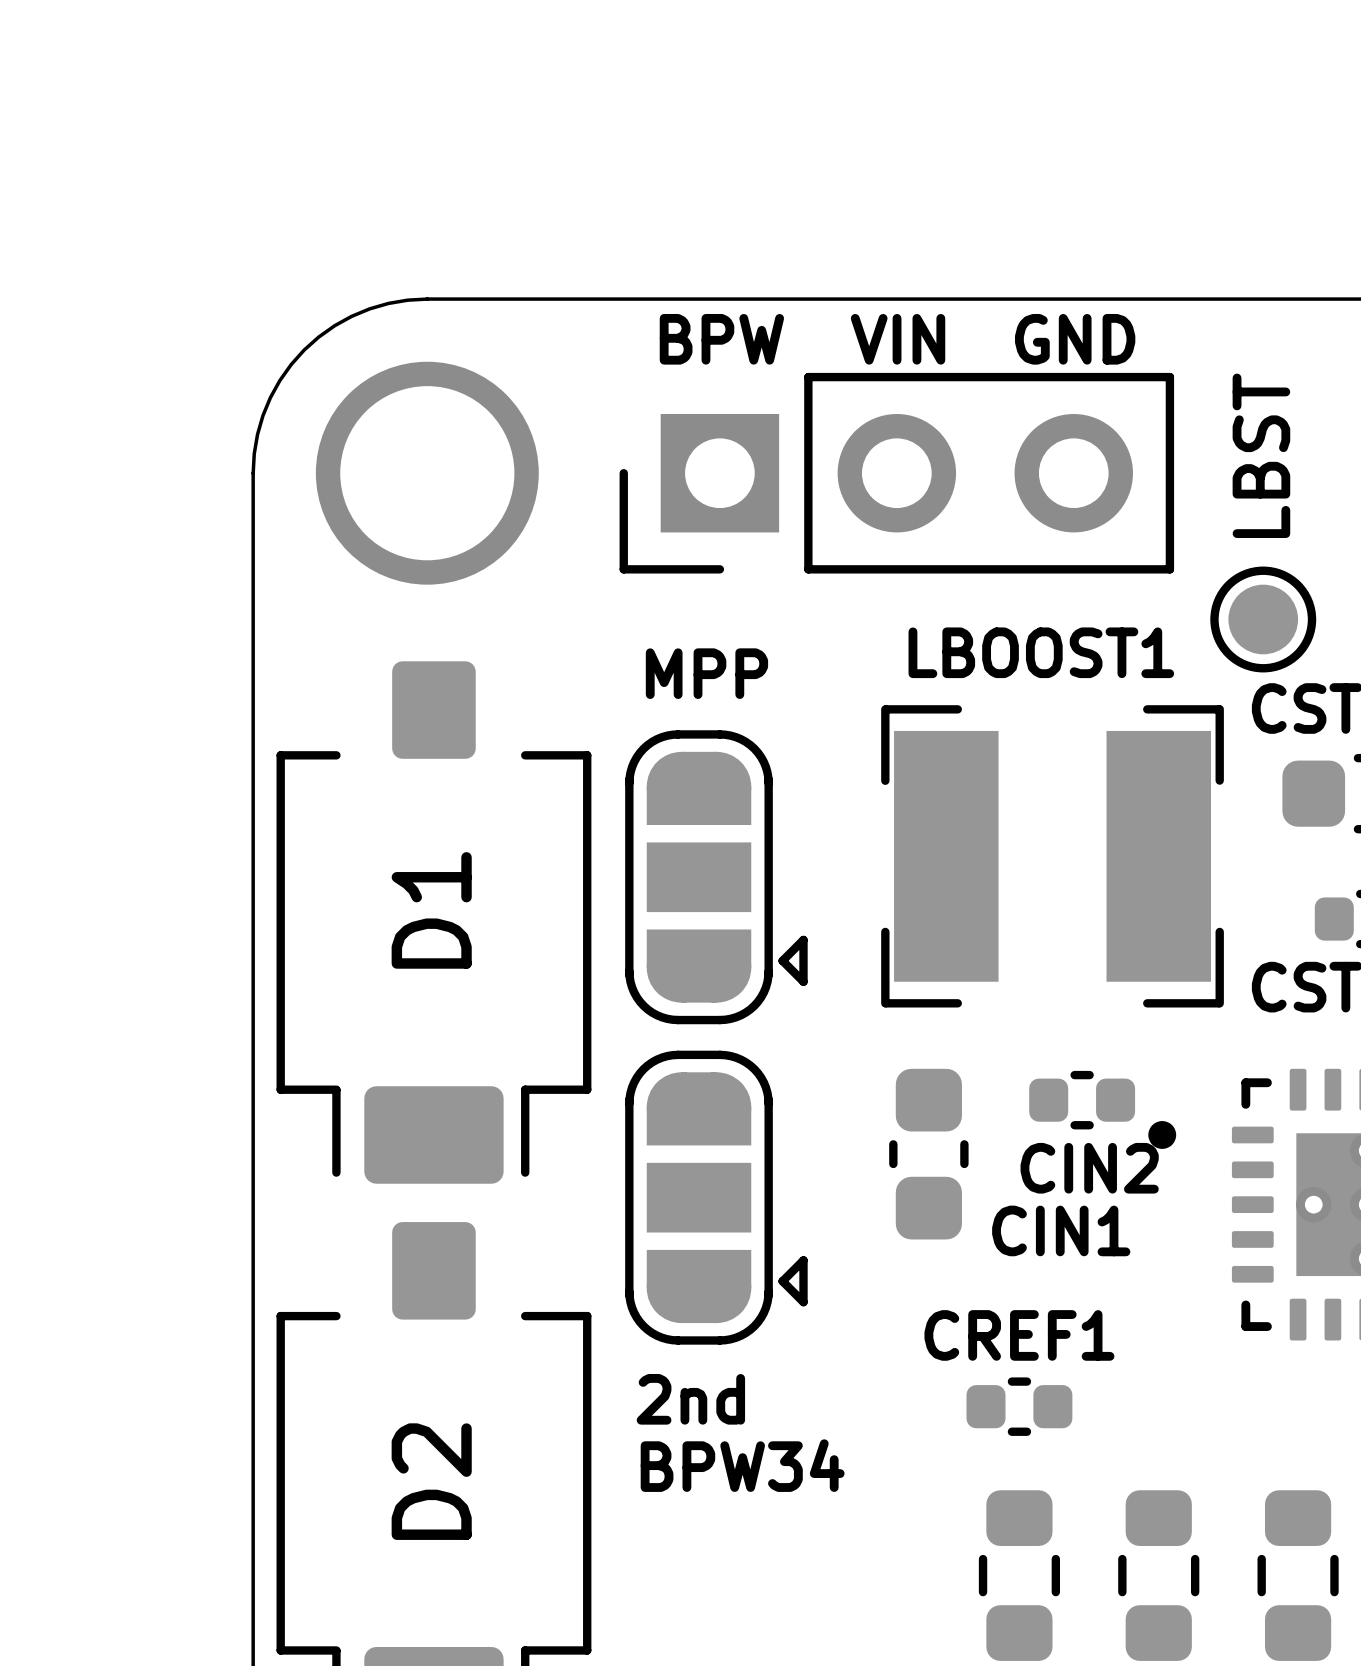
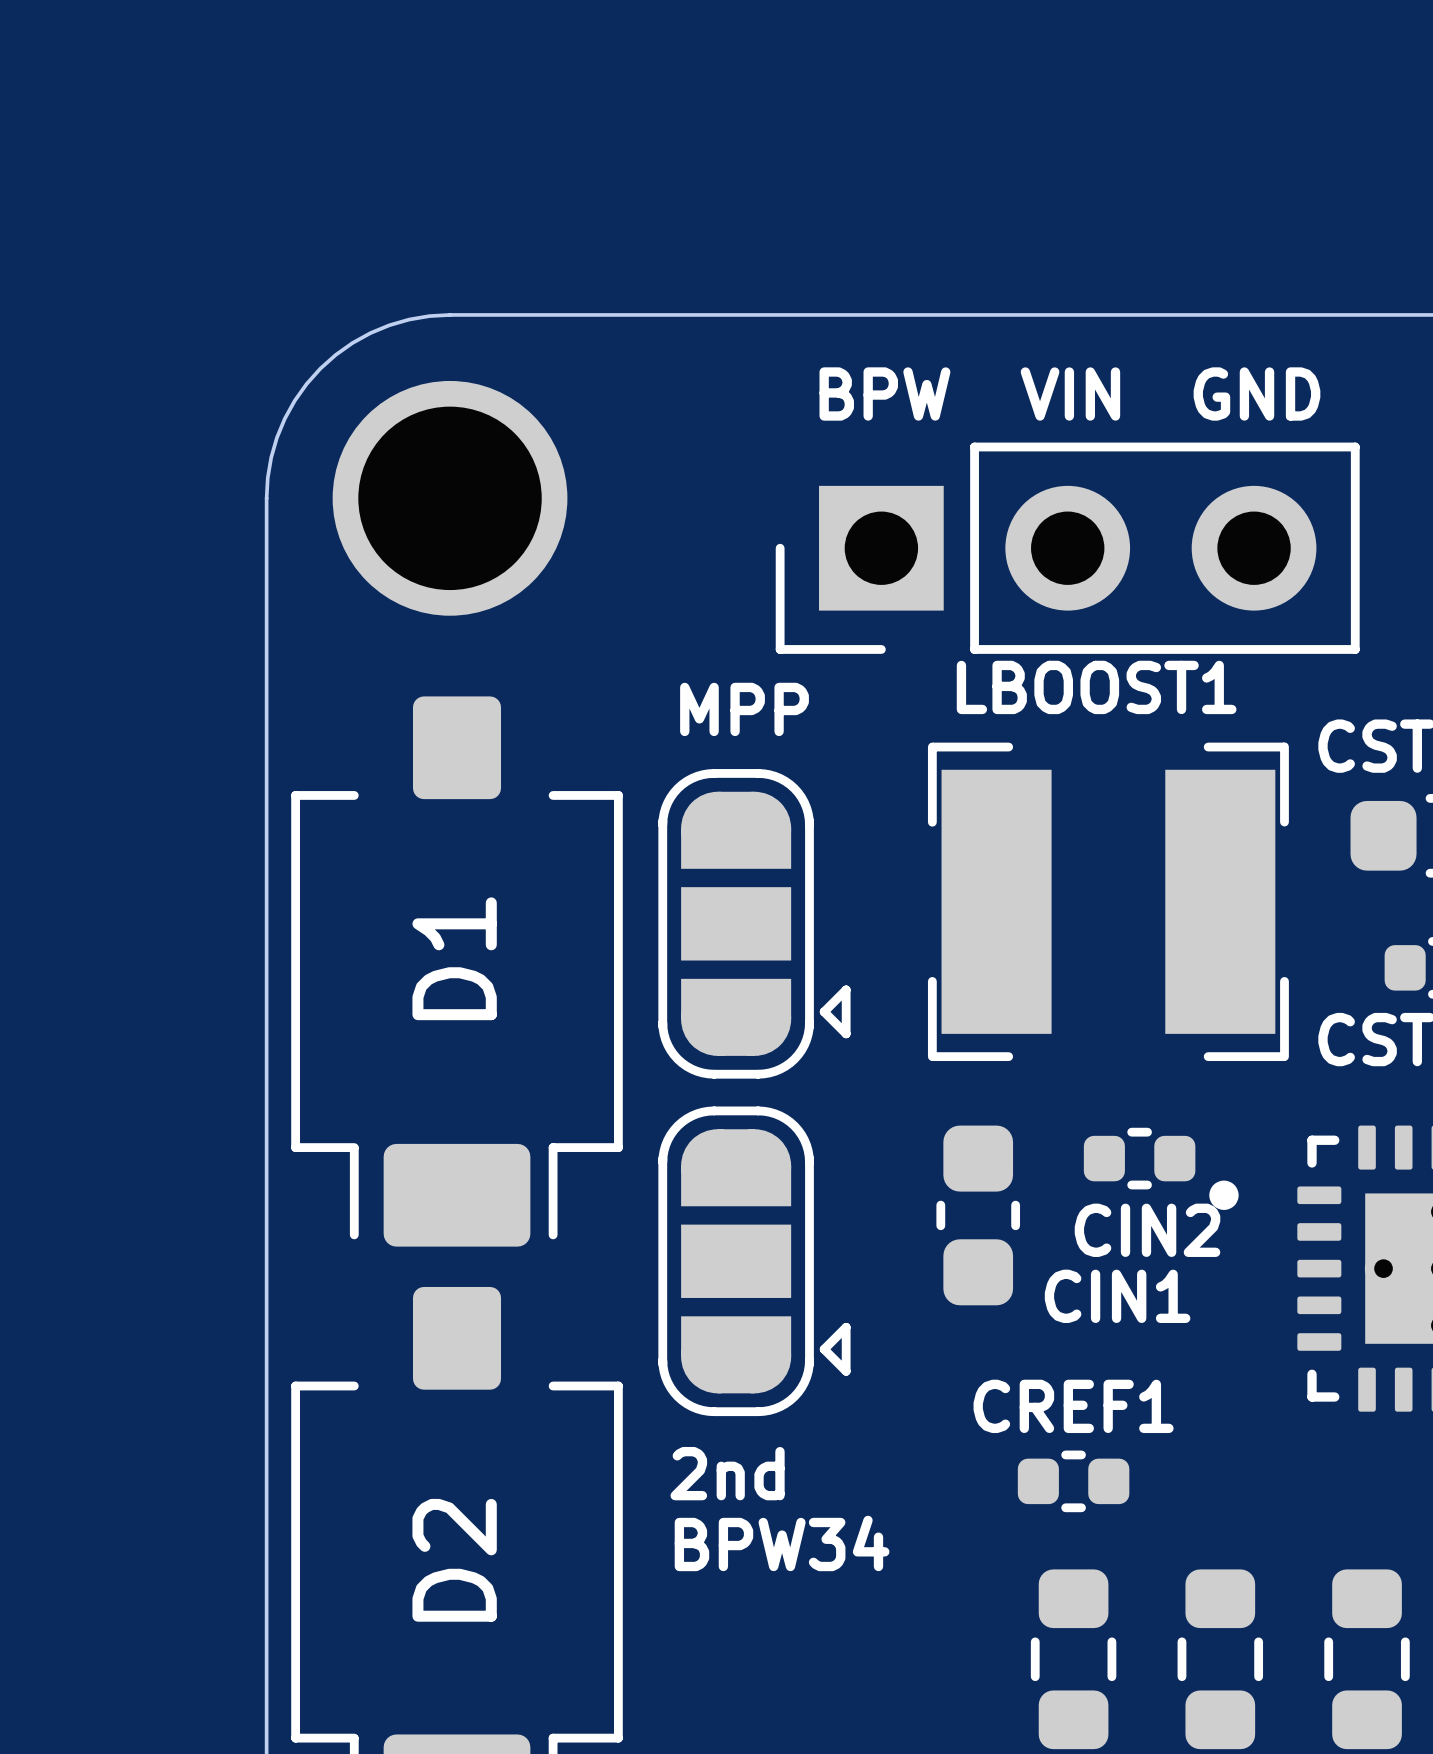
text position: BPW (721, 339) -> BPW (884, 394)
text position: VIN (898, 339) -> VIN (1070, 394)
text position: GND (1075, 339) -> GND (1256, 394)
part position: (896, 473) -> (1067, 548)
part: LBST (1263, 619) -> none

